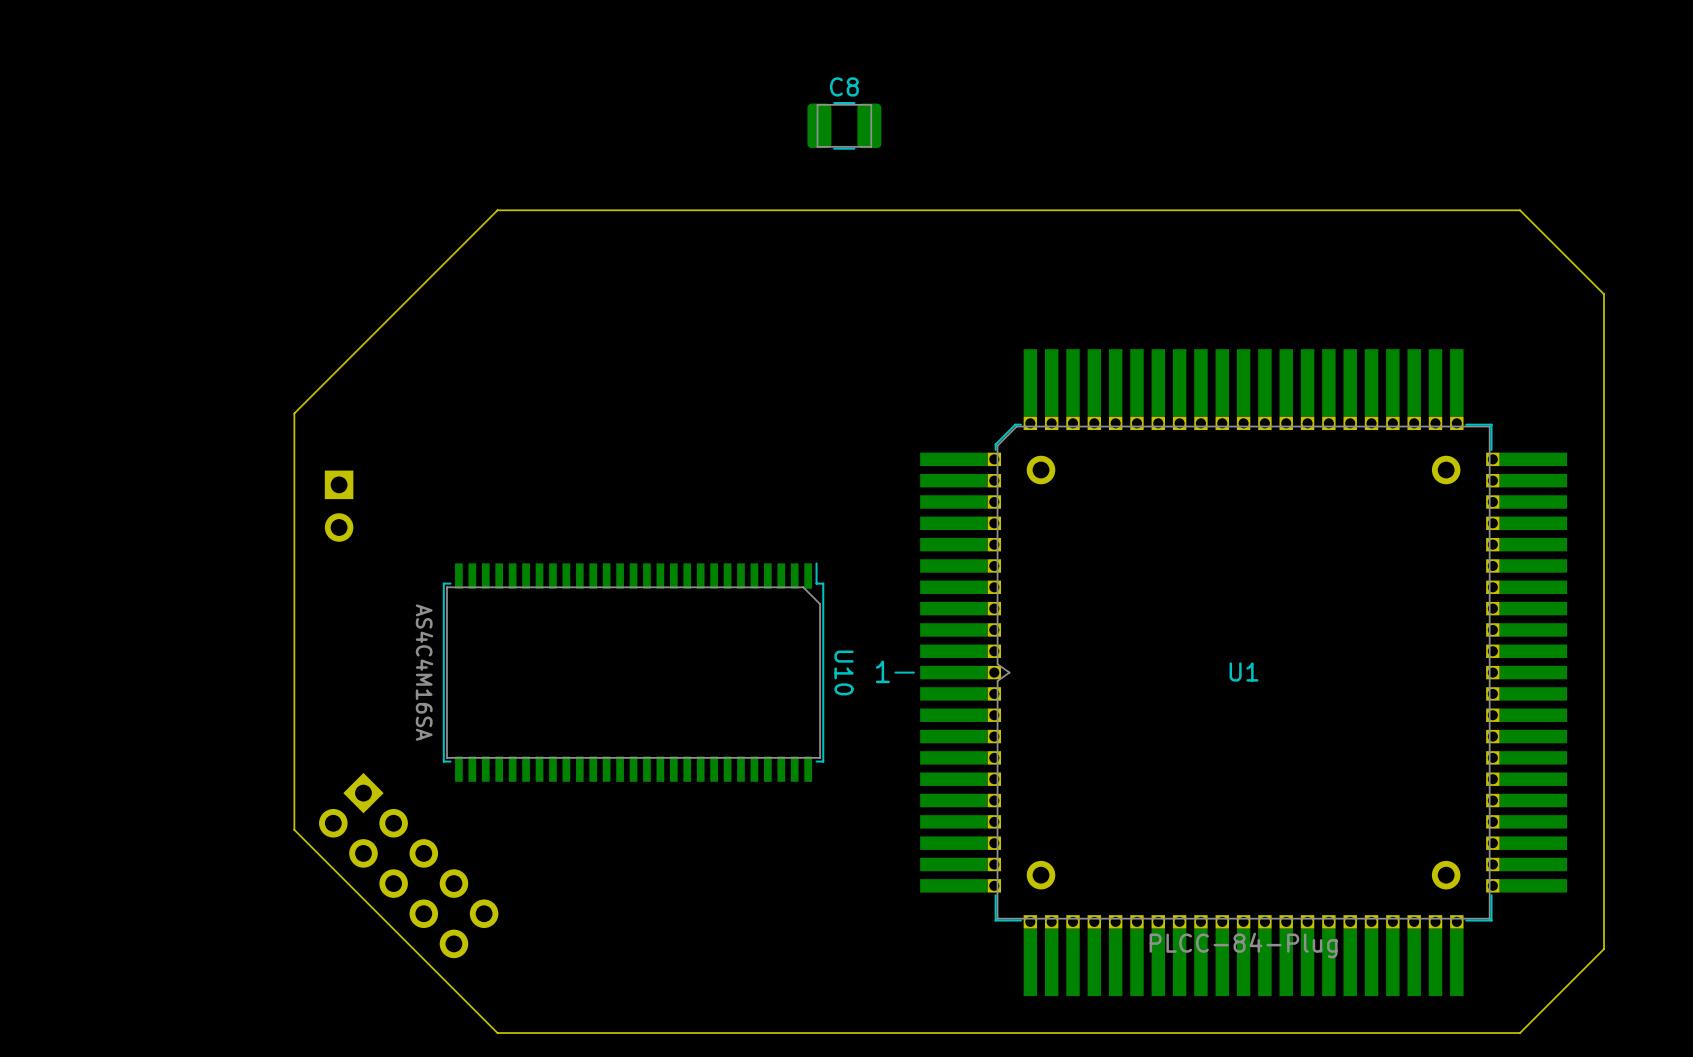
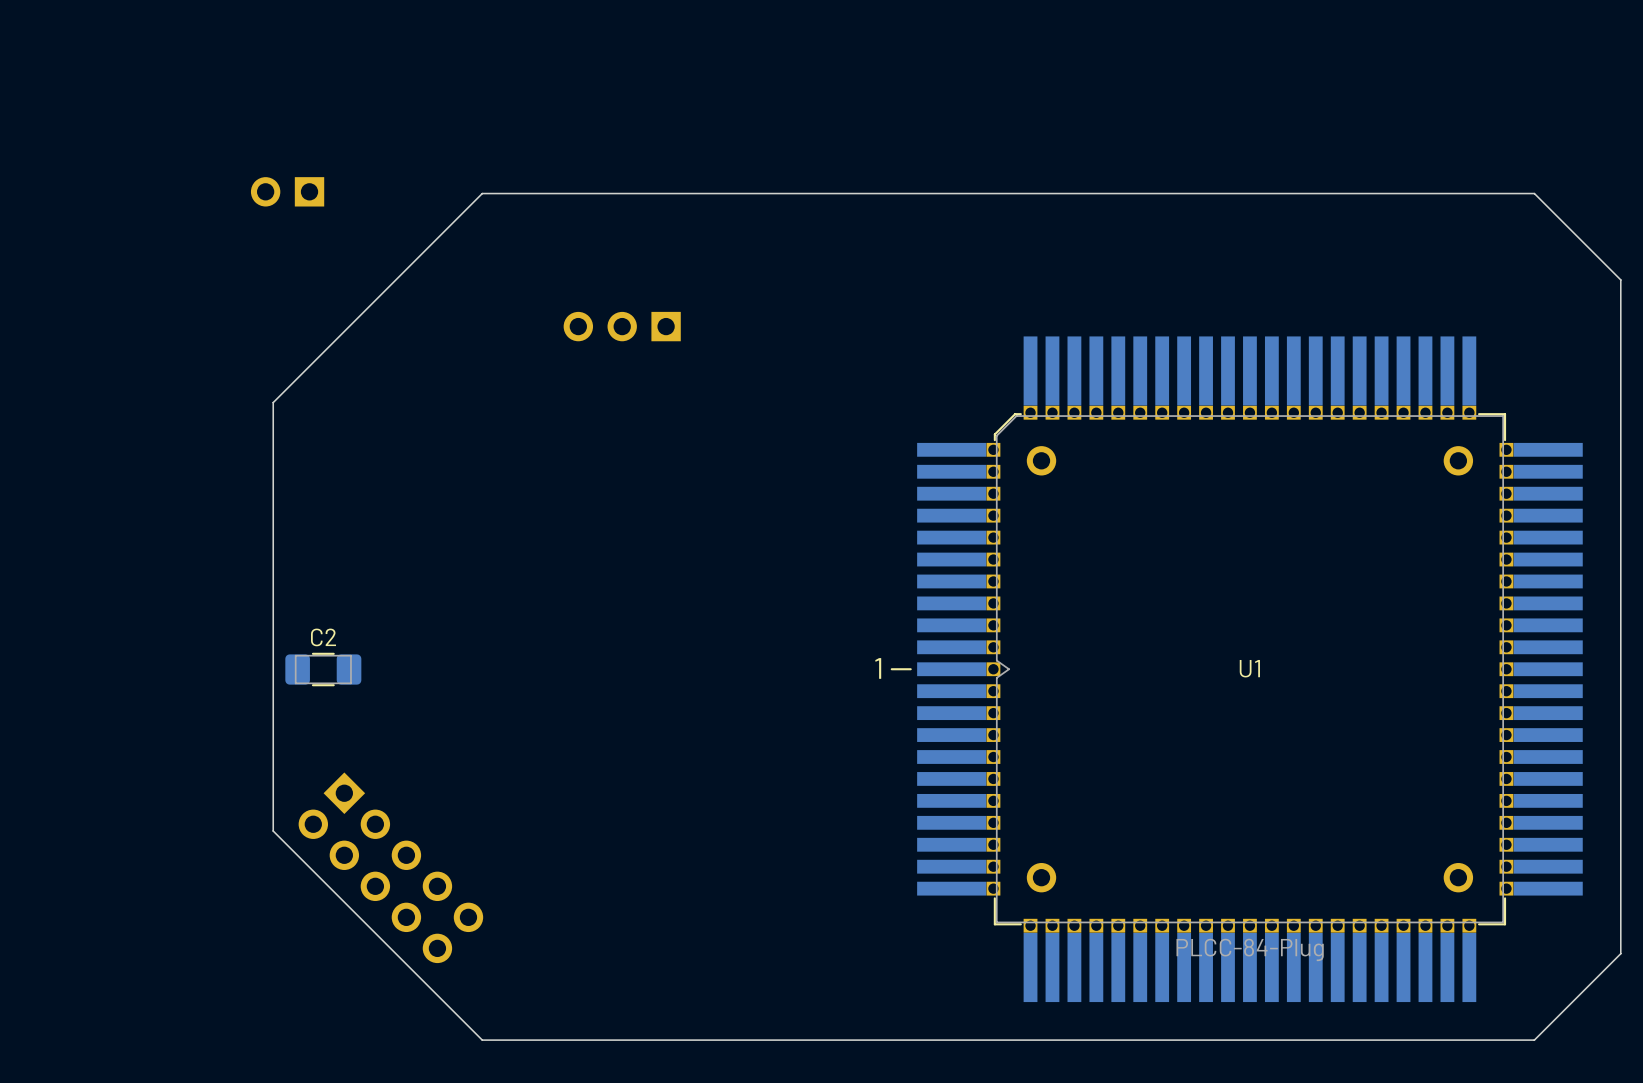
C8: (844, 125) -> none
part: none -> (622, 326)
part rotation: 0° (339, 506) -> 90° clockwise (287, 191)
part position: (339, 506) -> (287, 191)
C2: none -> (323, 669)
U10: AS4C4M16SA (633, 672) -> none

